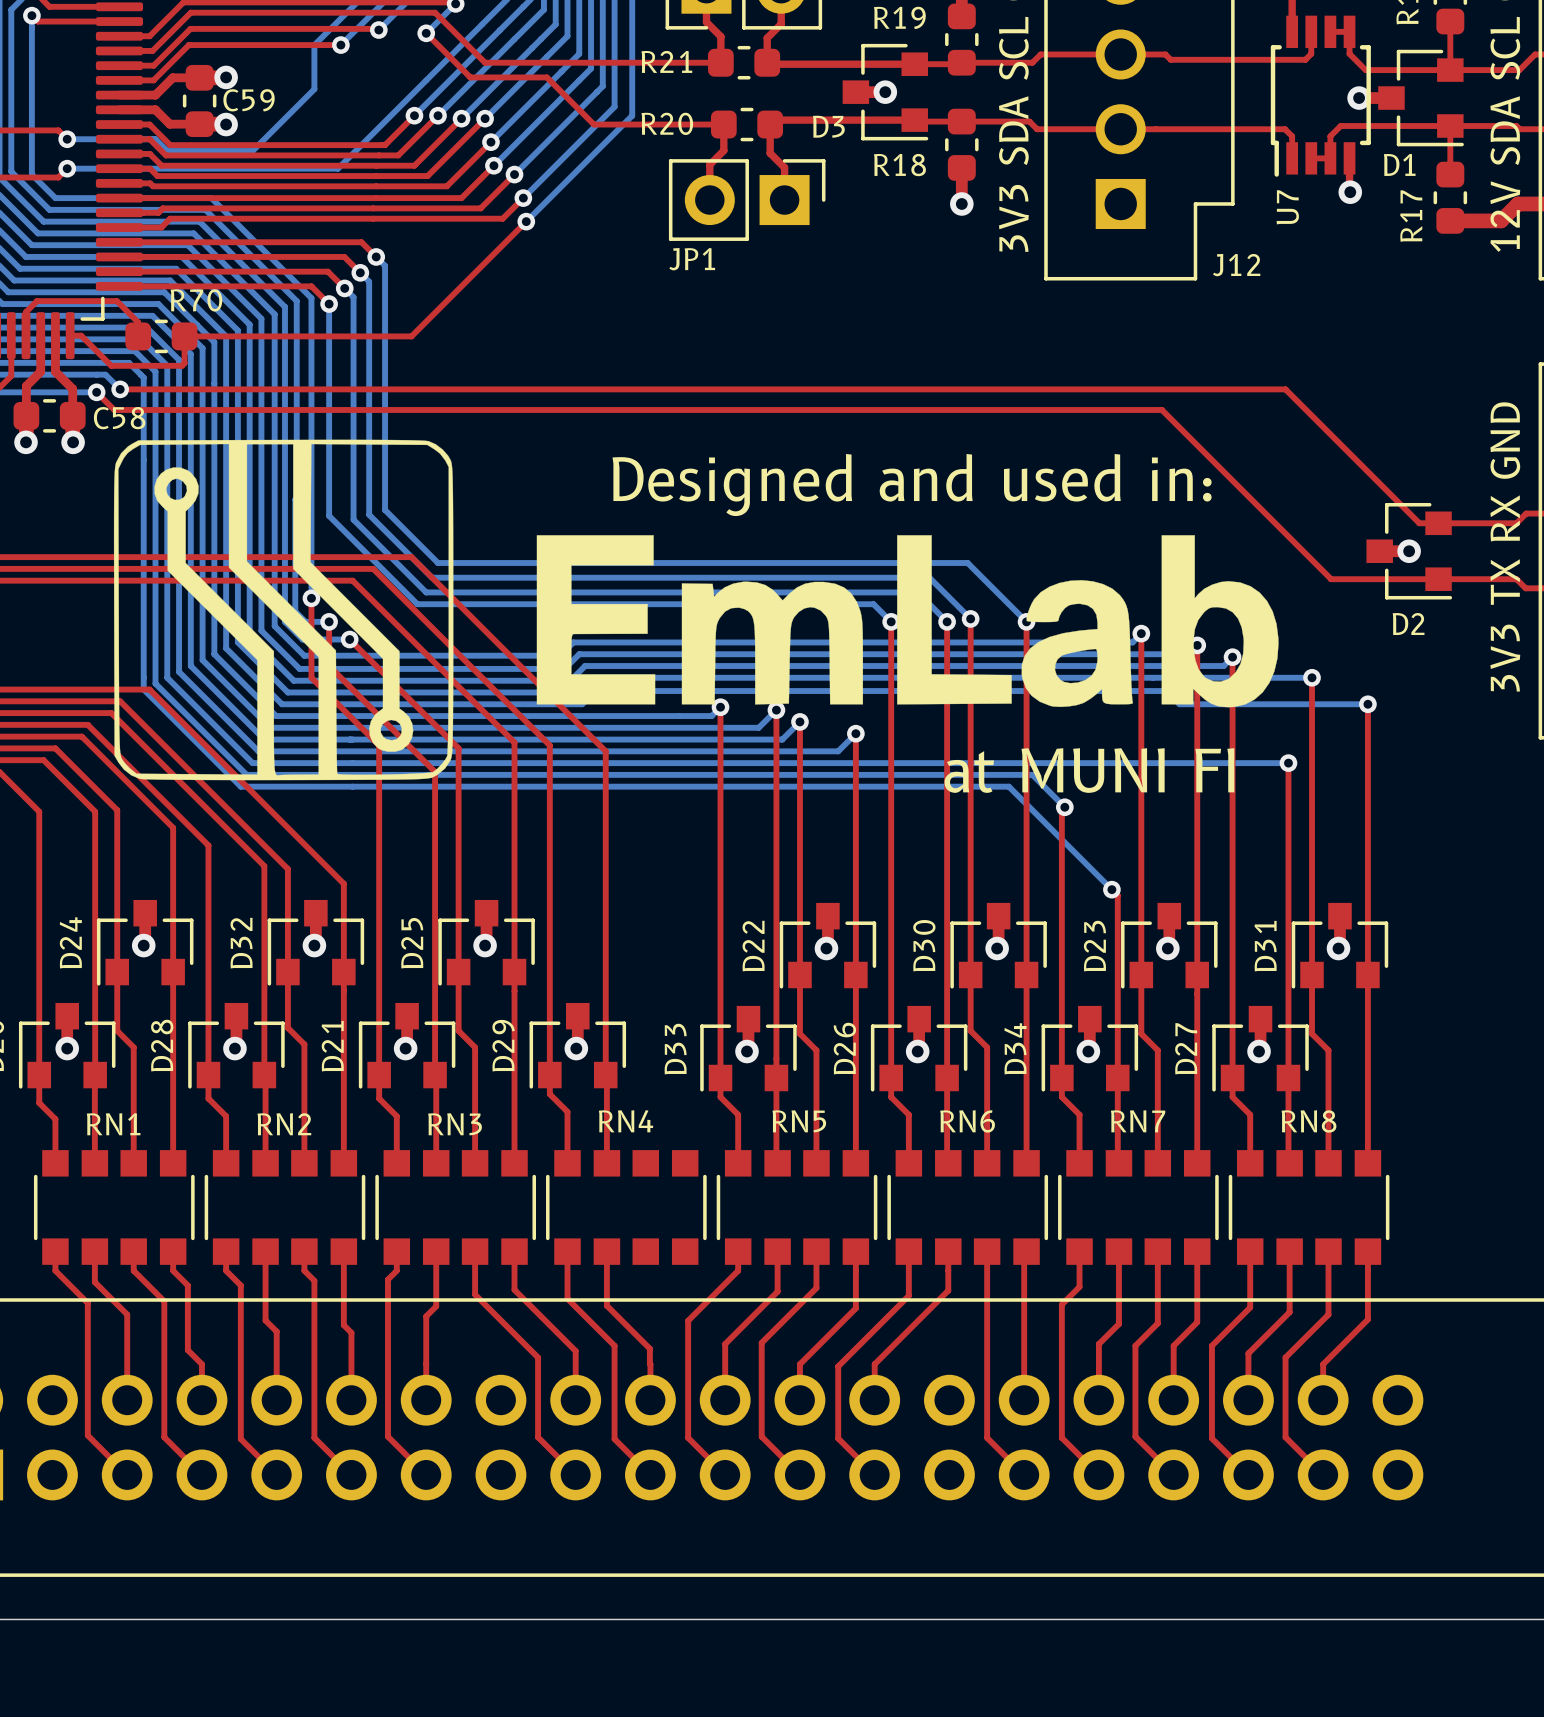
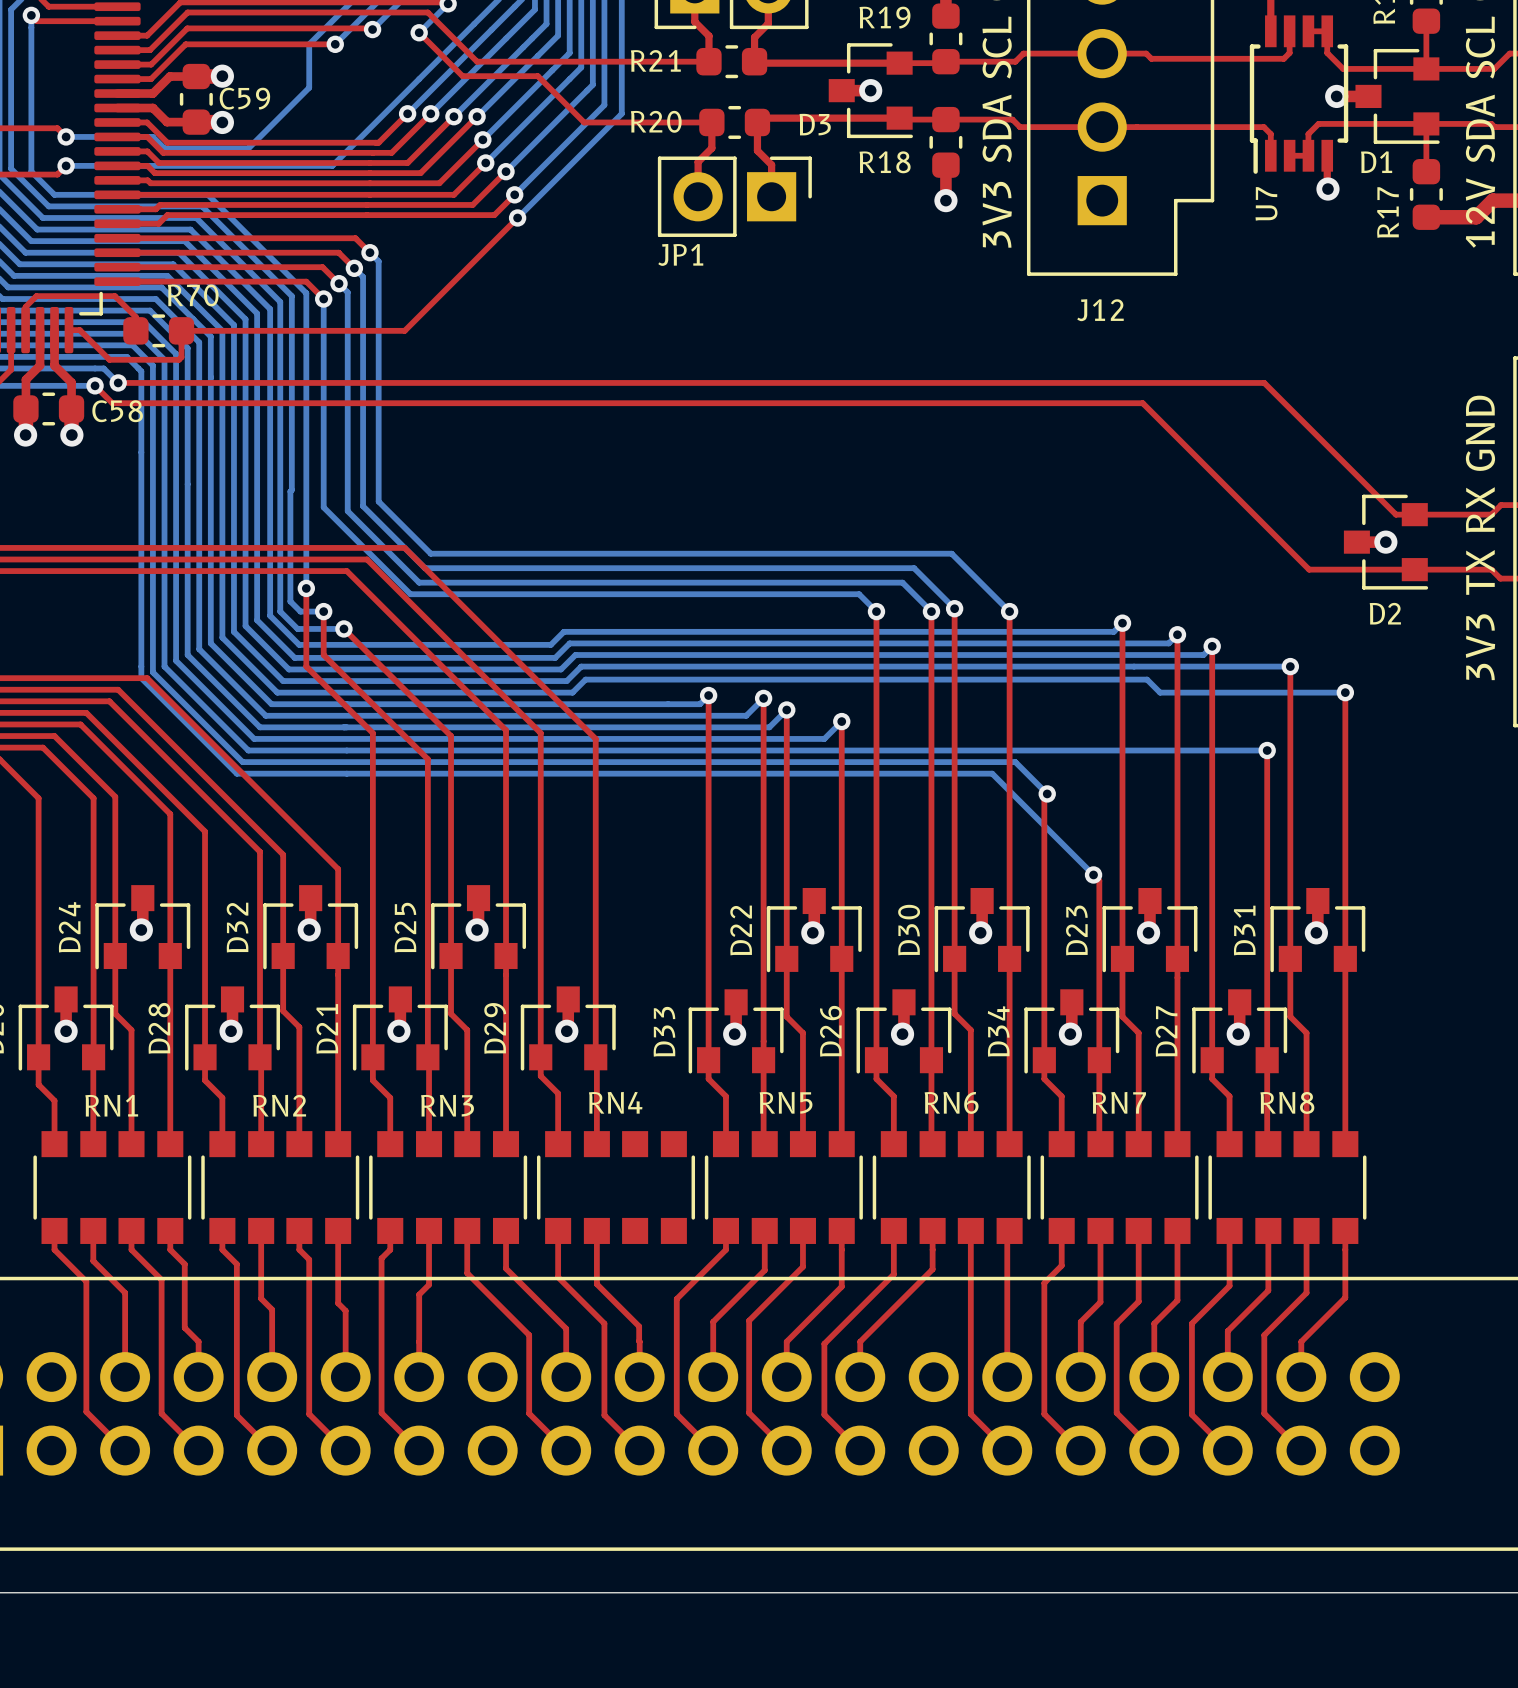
J12 name position: J12 (1236, 265) -> J12 (1100, 310)
drawing: [113, 439, 1279, 781] -> none
text: Designed and used in: (912, 485) -> none
text: at MUNI FI (1089, 770) -> none

